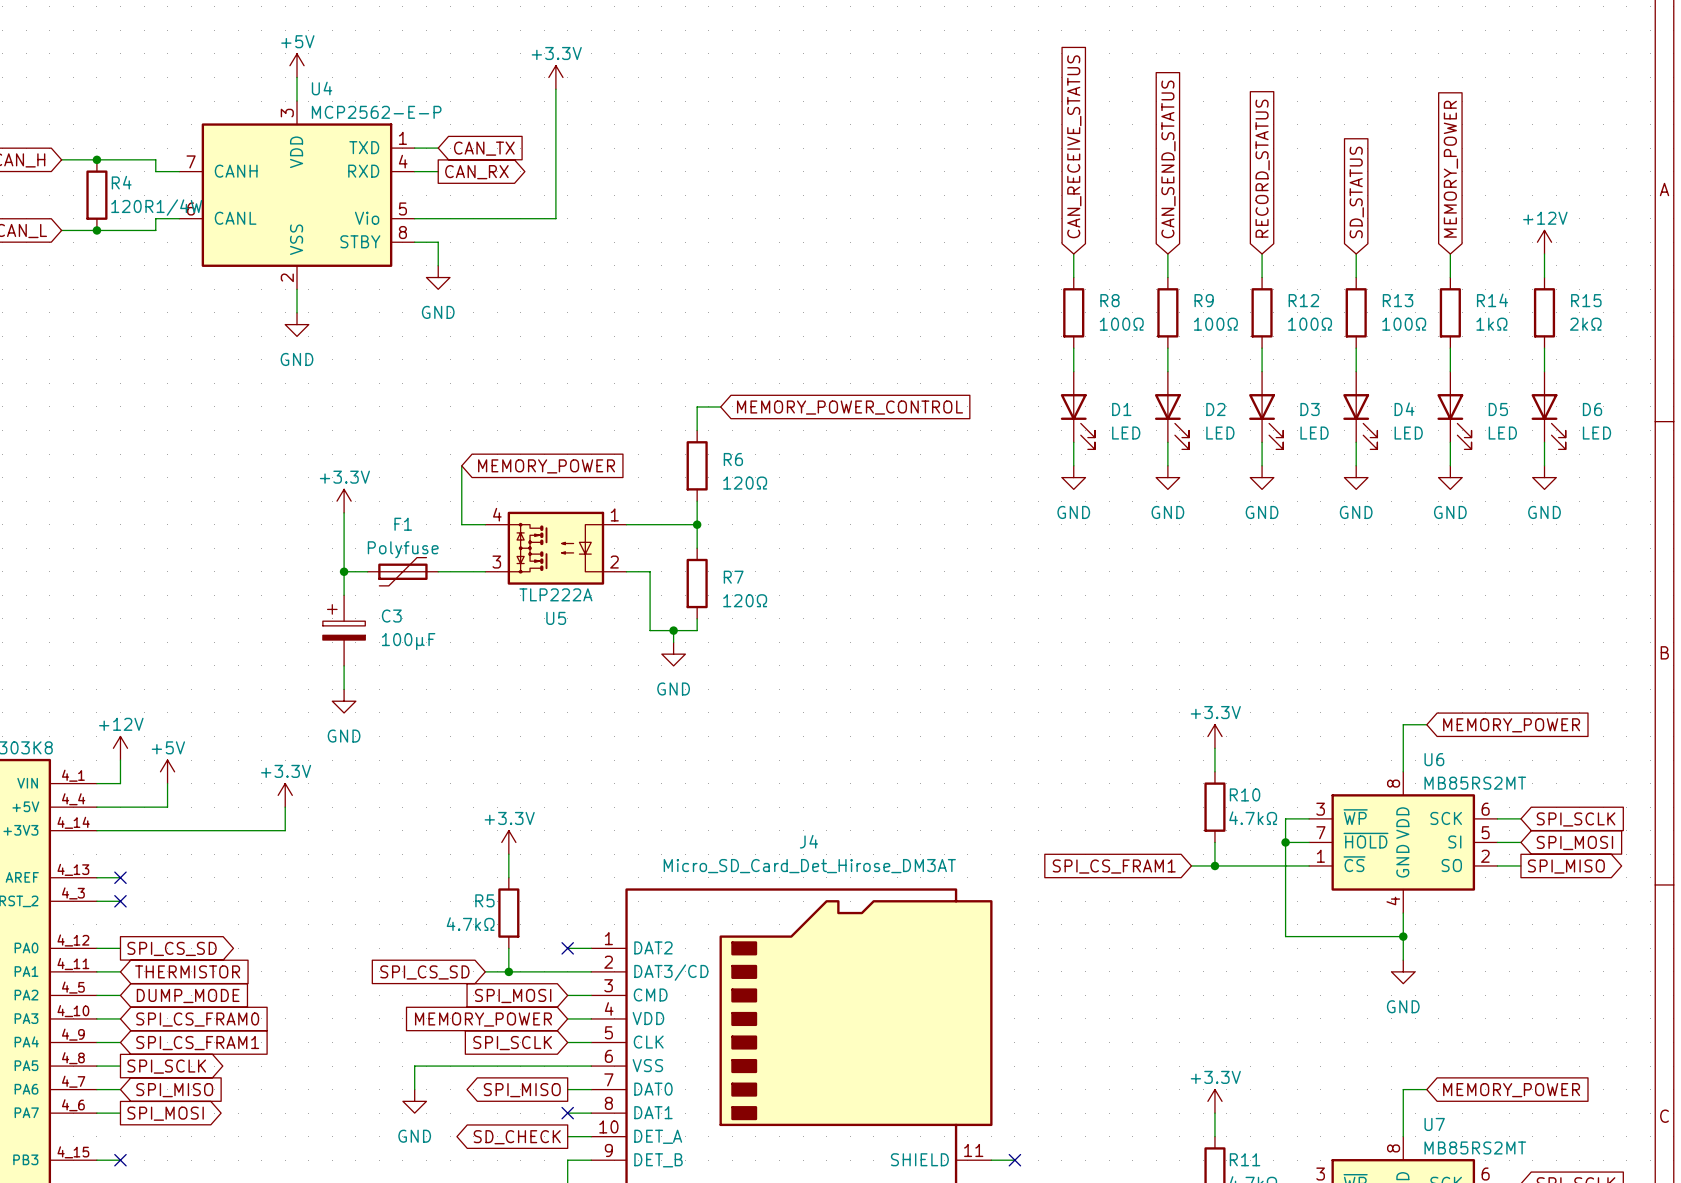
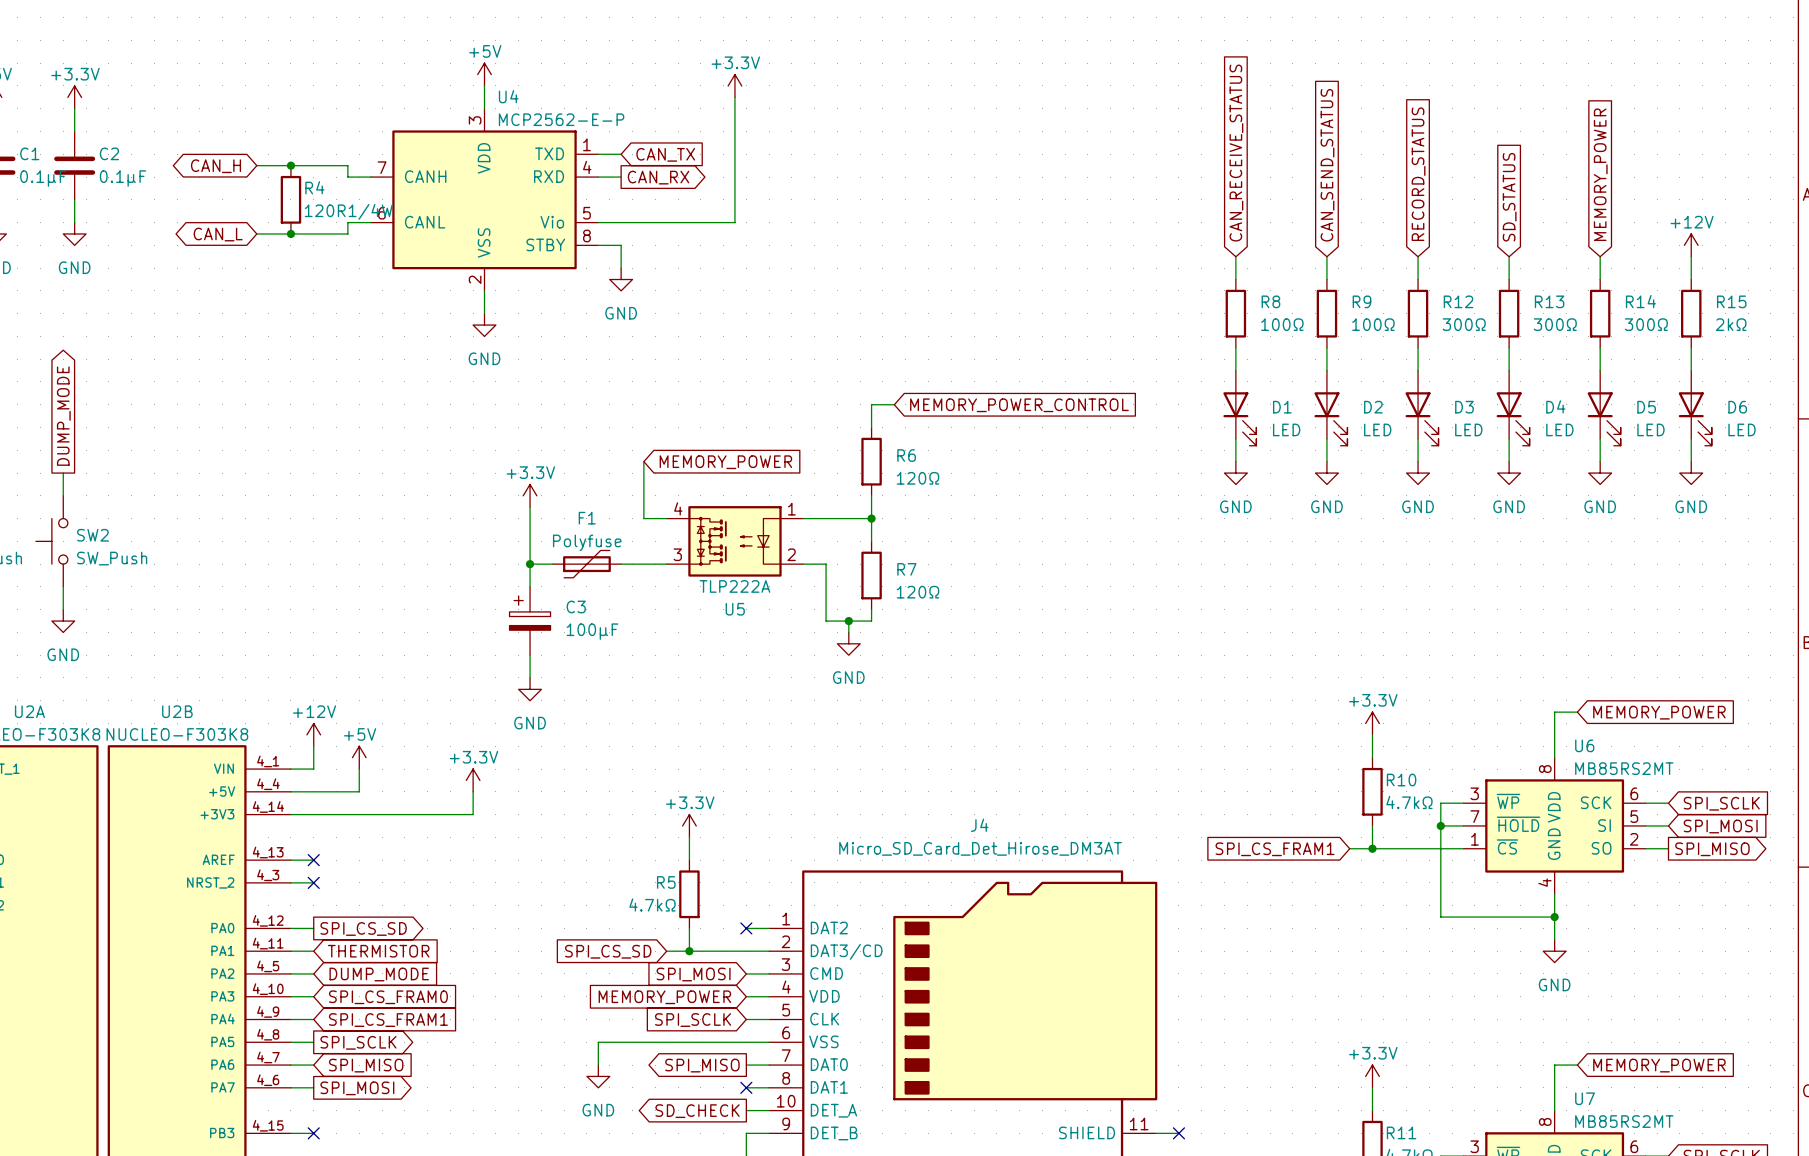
R12 value: 100Ω (1310, 324) -> 300Ω (1464, 324)
R13 value: 100Ω (1404, 324) -> 300Ω (1555, 324)
R14 value: 1kΩ (1491, 324) -> 300Ω (1646, 324)

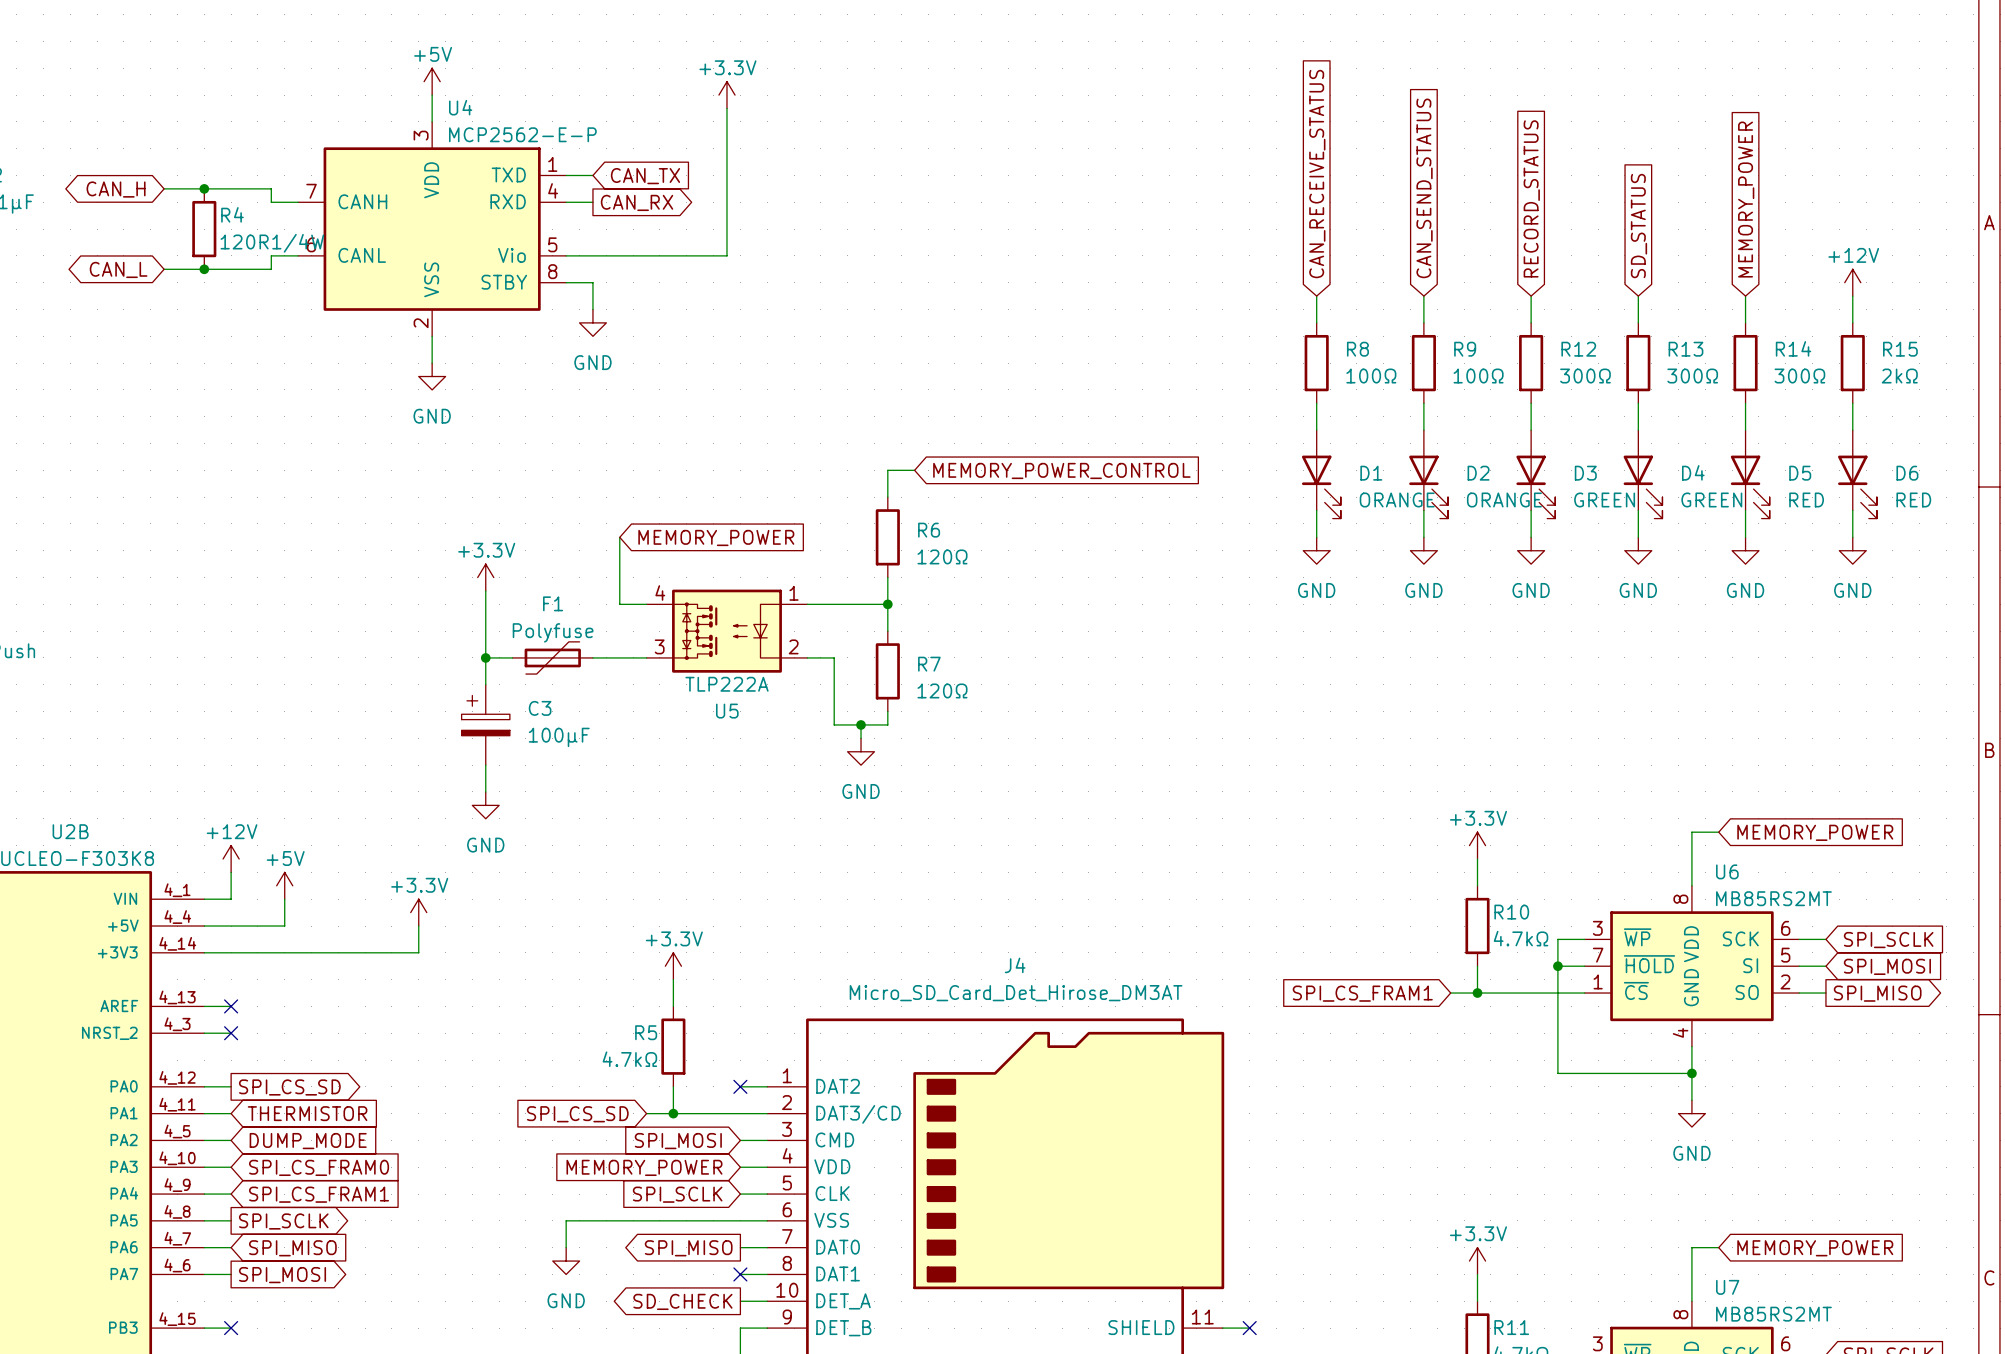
D1 value: LED (1286, 429) -> ORANGE (1397, 499)
D2 value: LED (1377, 429) -> ORANGE (1504, 499)
D3 value: LED (1468, 429) -> GREEN (1604, 499)
D4 value: LED (1559, 429) -> GREEN (1711, 499)
D5 value: LED (1650, 429) -> RED (1806, 499)
D6 value: LED (1742, 429) -> RED (1913, 499)

